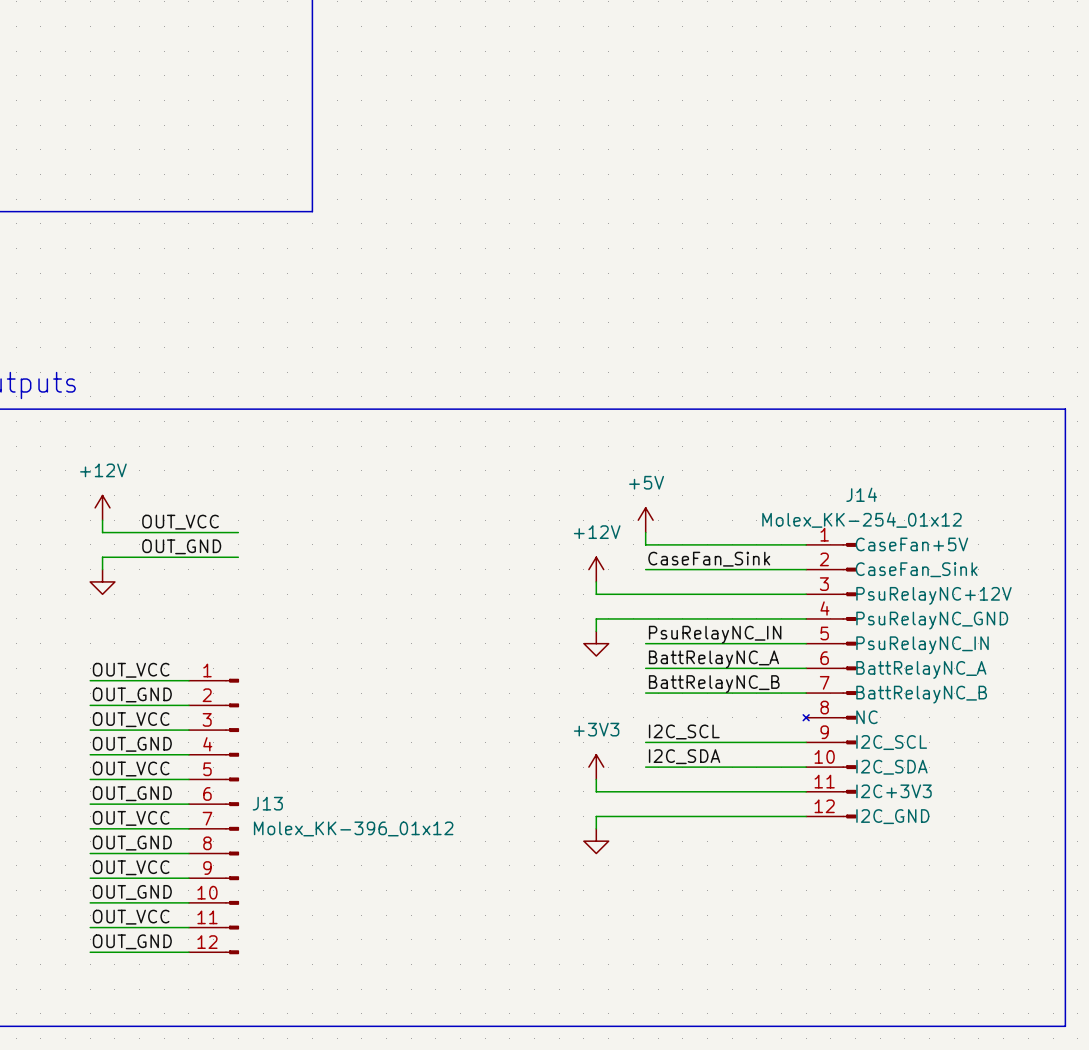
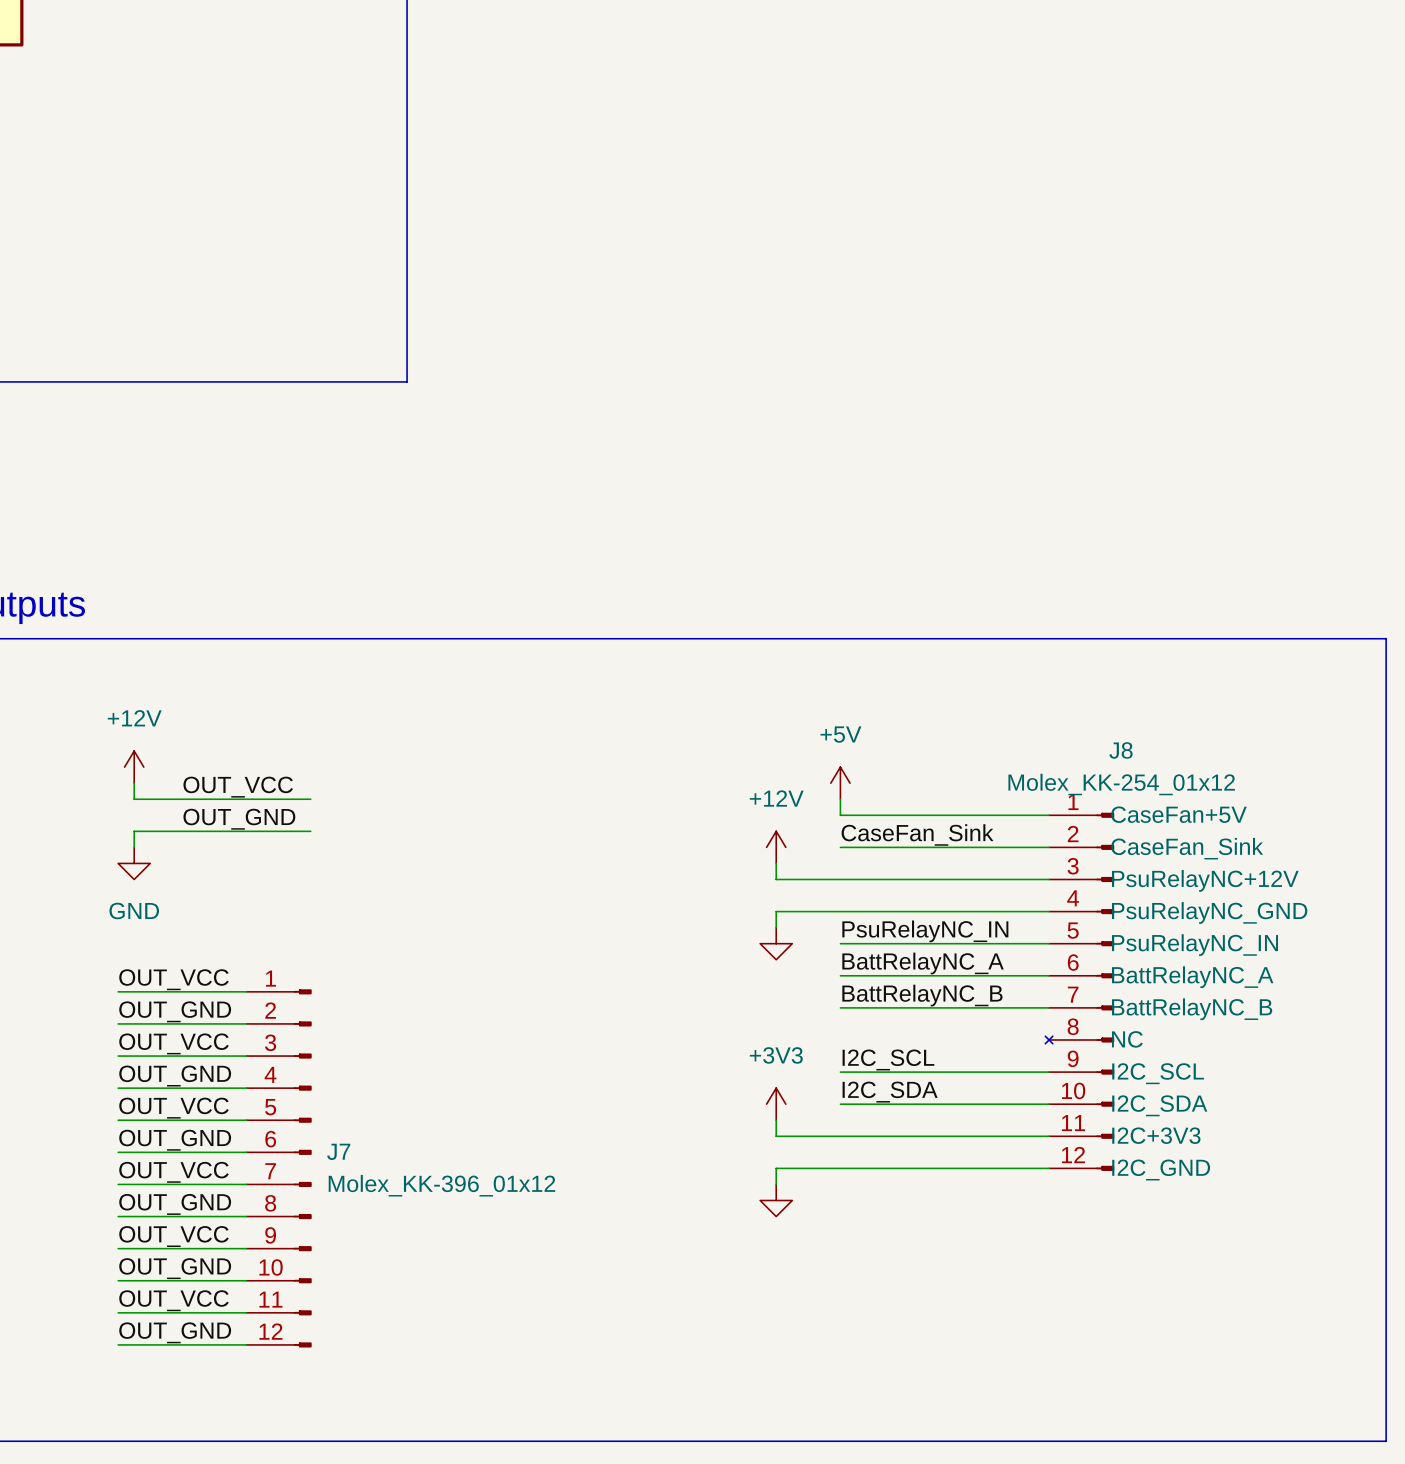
J14 name: J14 (861, 494) -> J8 (1120, 750)
power symbol text: none -> GND (134, 910)
J13 name: J13 (267, 803) -> J7 (338, 1151)

